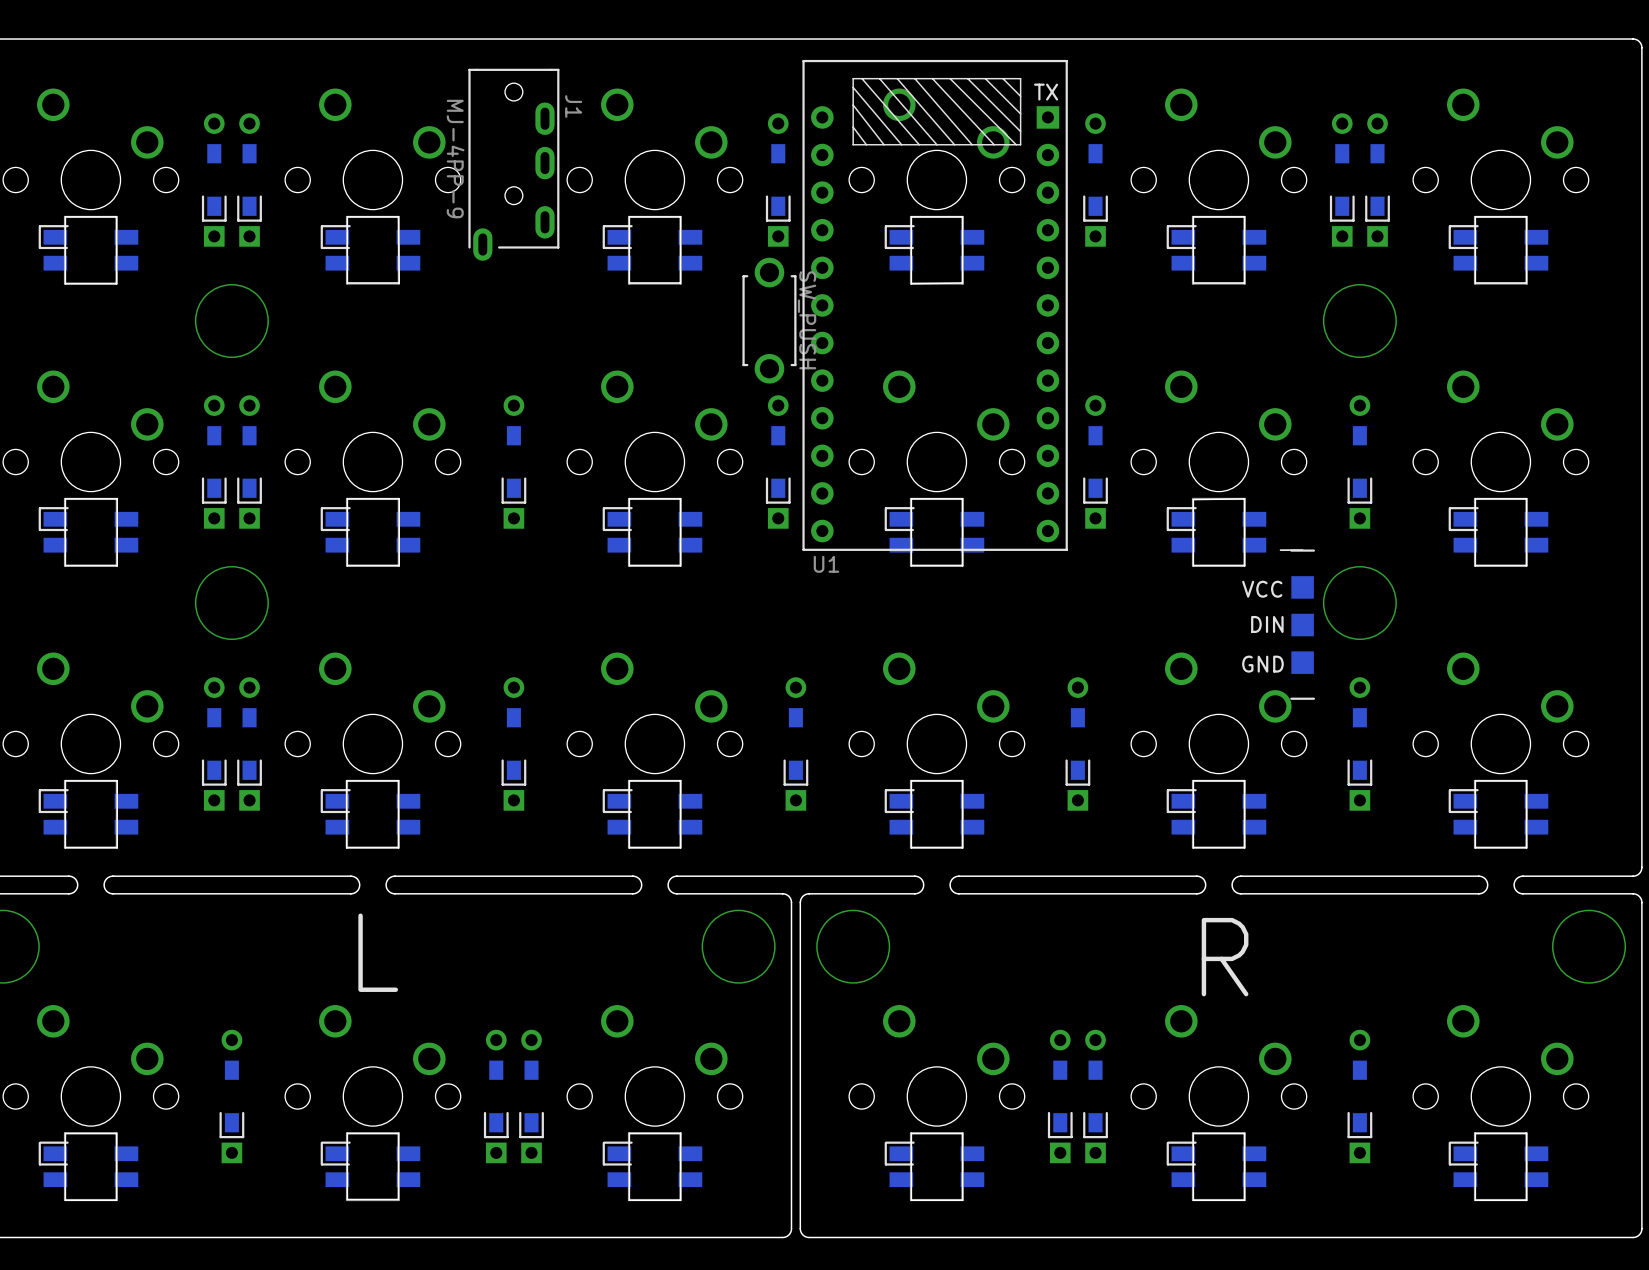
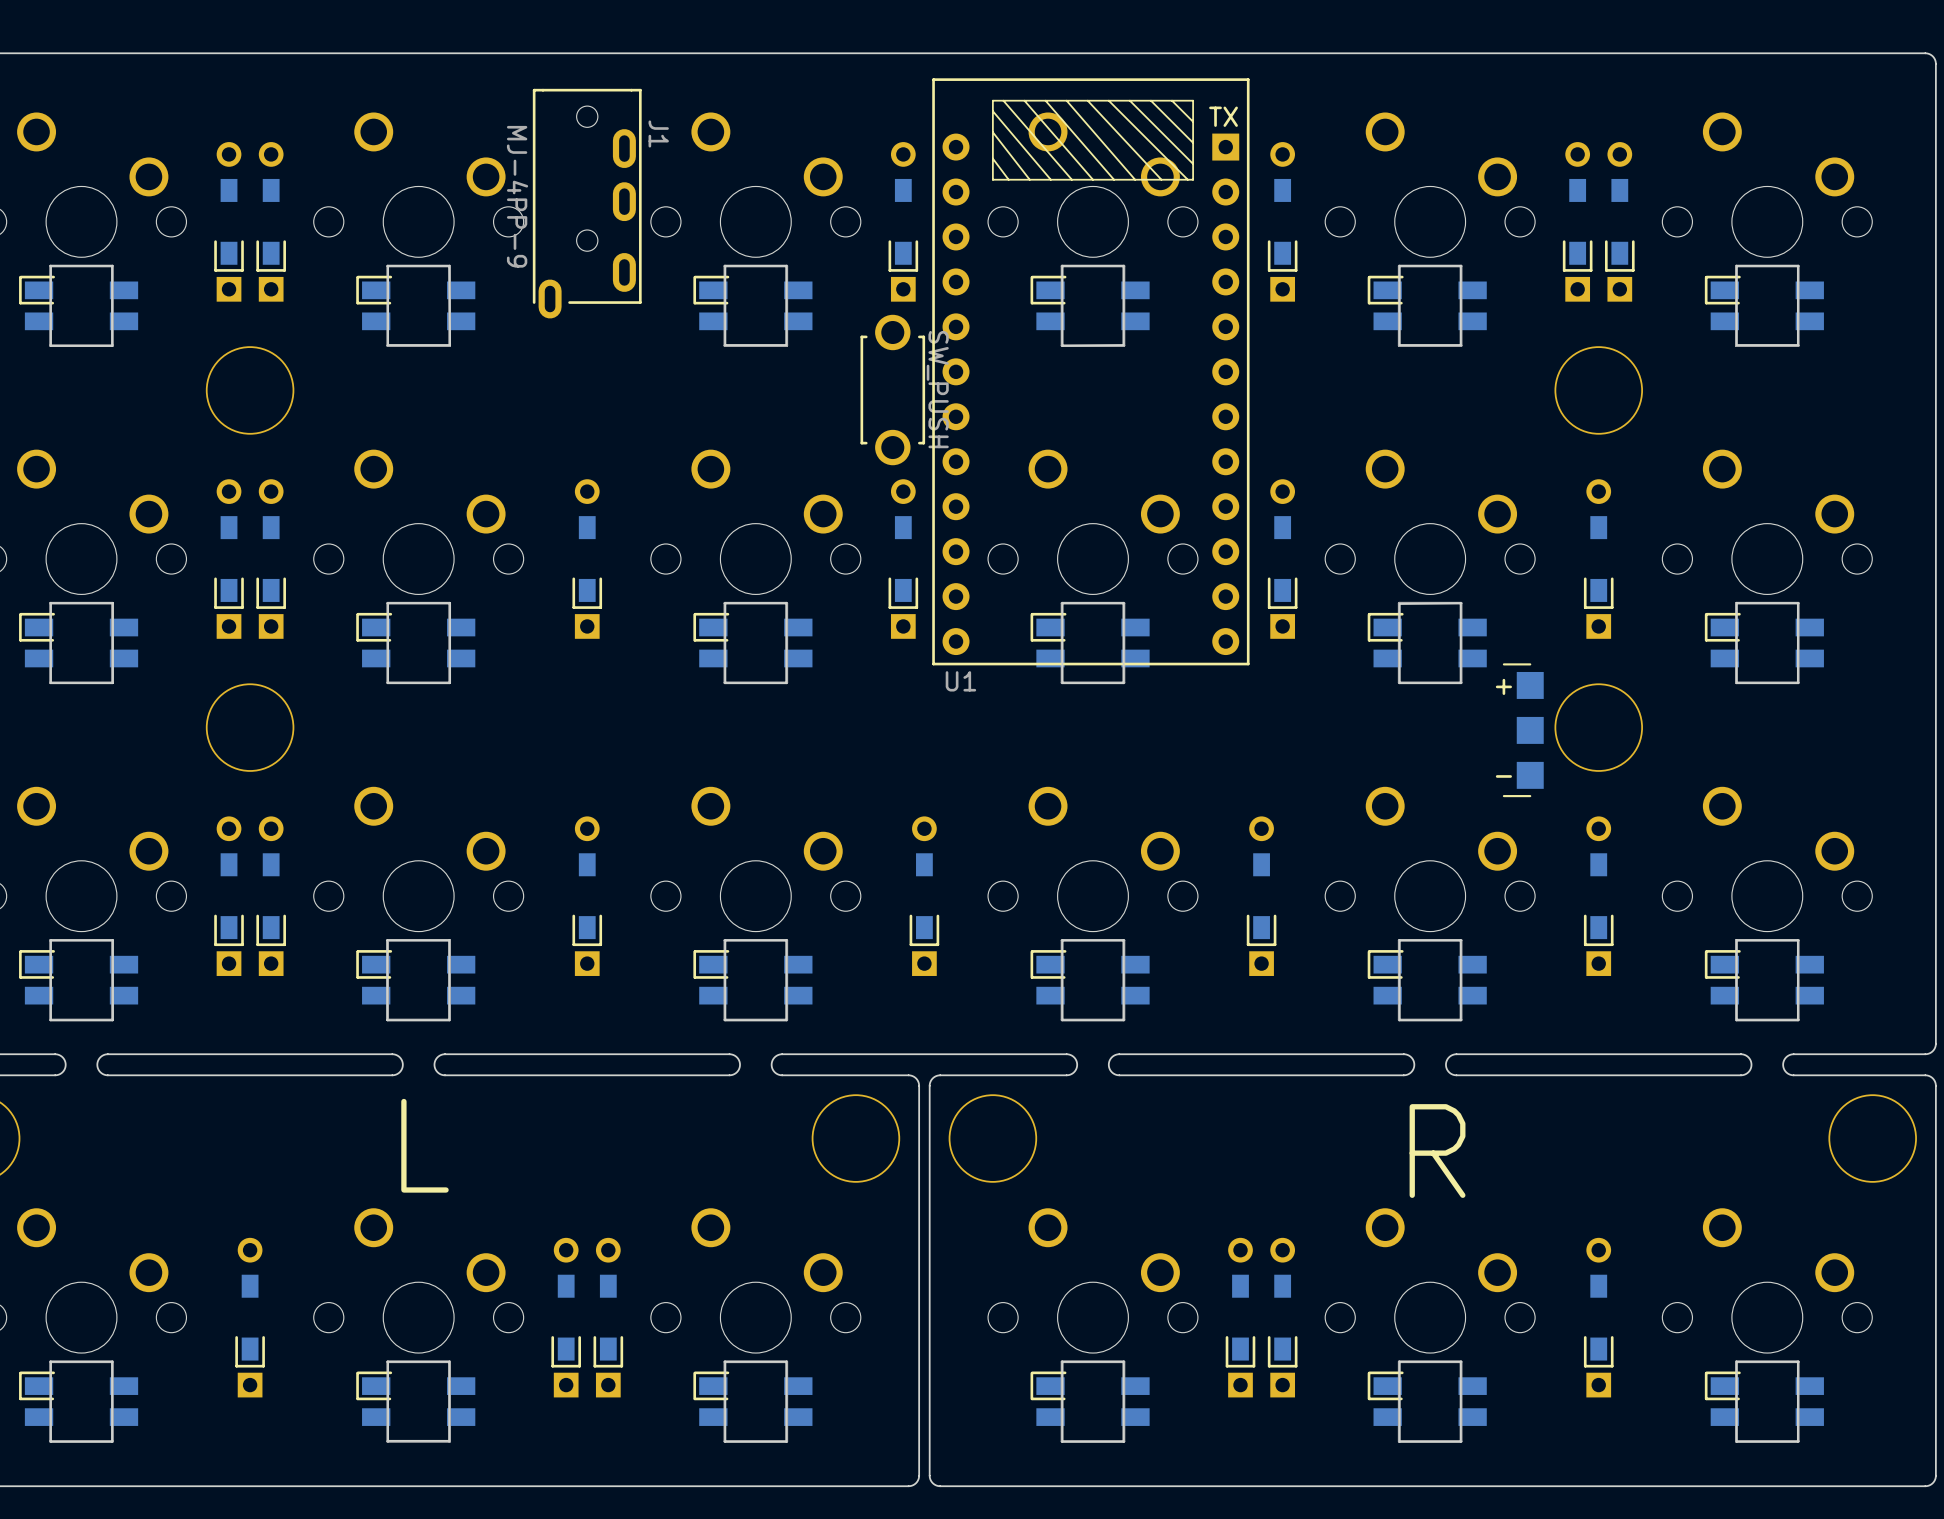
text: none -> + (1503, 686)
text: VCC (1262, 589) -> none
part: none -> (1530, 730)
text: DIN (1267, 624) -> none
part: (1302, 624) -> none
text: none -> - (1503, 776)
line: none -> (1530, 796) (1503, 796)
text: GND (1262, 664) -> none

